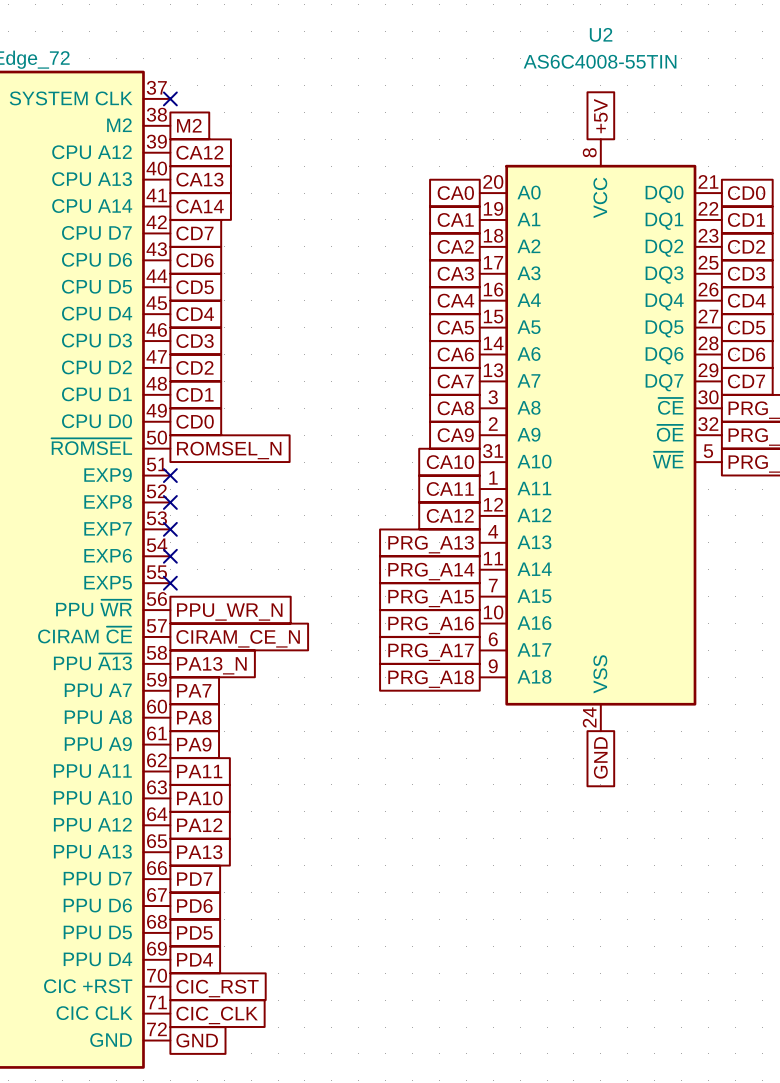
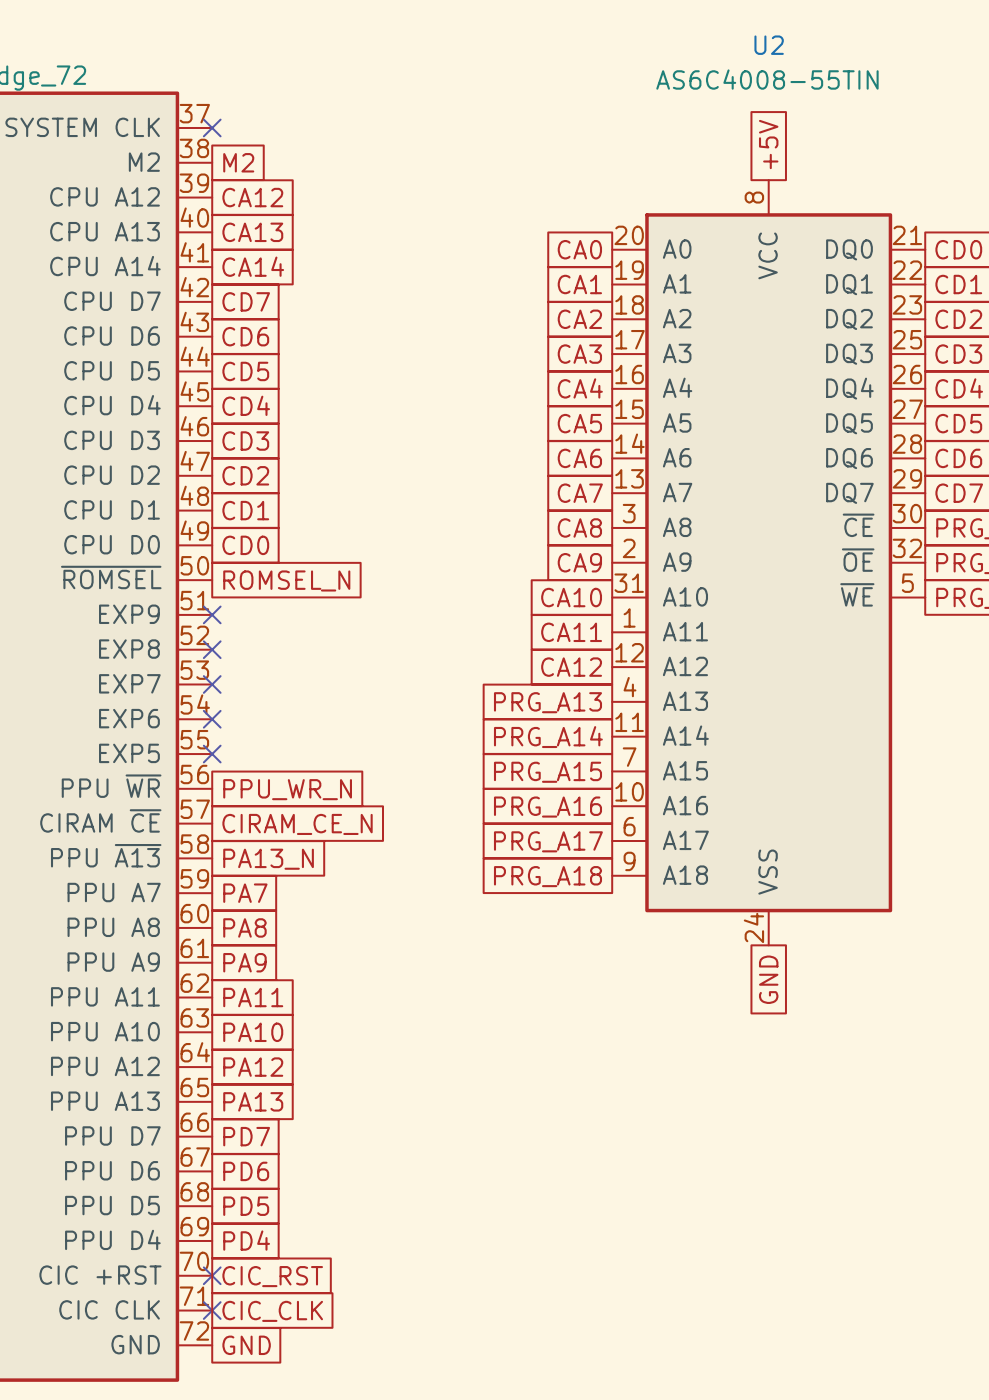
no-connect mark: none -> (212, 1275)
no-connect mark: none -> (212, 1310)

